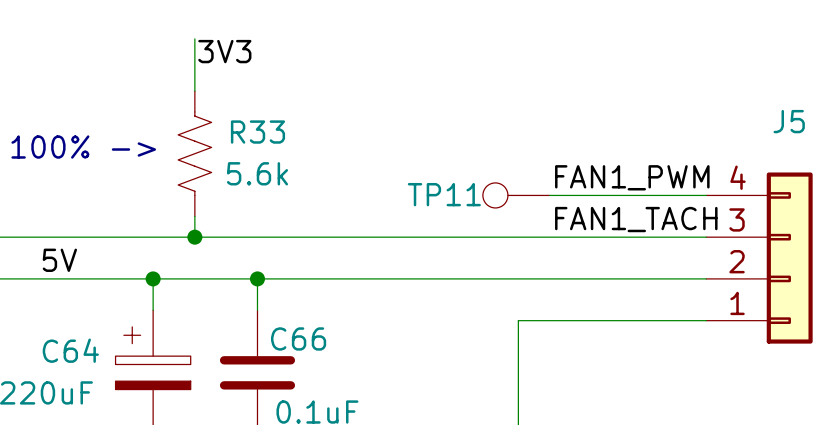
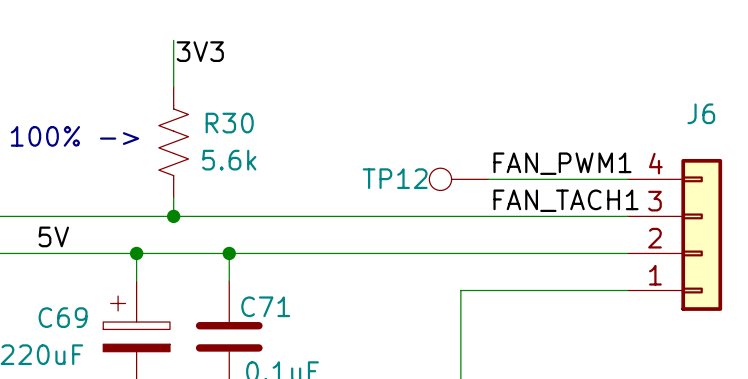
J5 name: J5 (789, 121) -> J6 (701, 113)
R33 name: R33 (257, 132) -> R30 (229, 123)
label: FAN1_PWM (632, 177) -> FAN_PWM1 (562, 163)
TP11 name: TP11 (444, 194) -> TP12 (395, 178)
label: FAN1_TACH (636, 219) -> FAN_TACH1 (566, 200)
C66 name: C66 (298, 338) -> C71 (265, 306)
C64 name: C64 (70, 350) -> C69 (63, 317)

